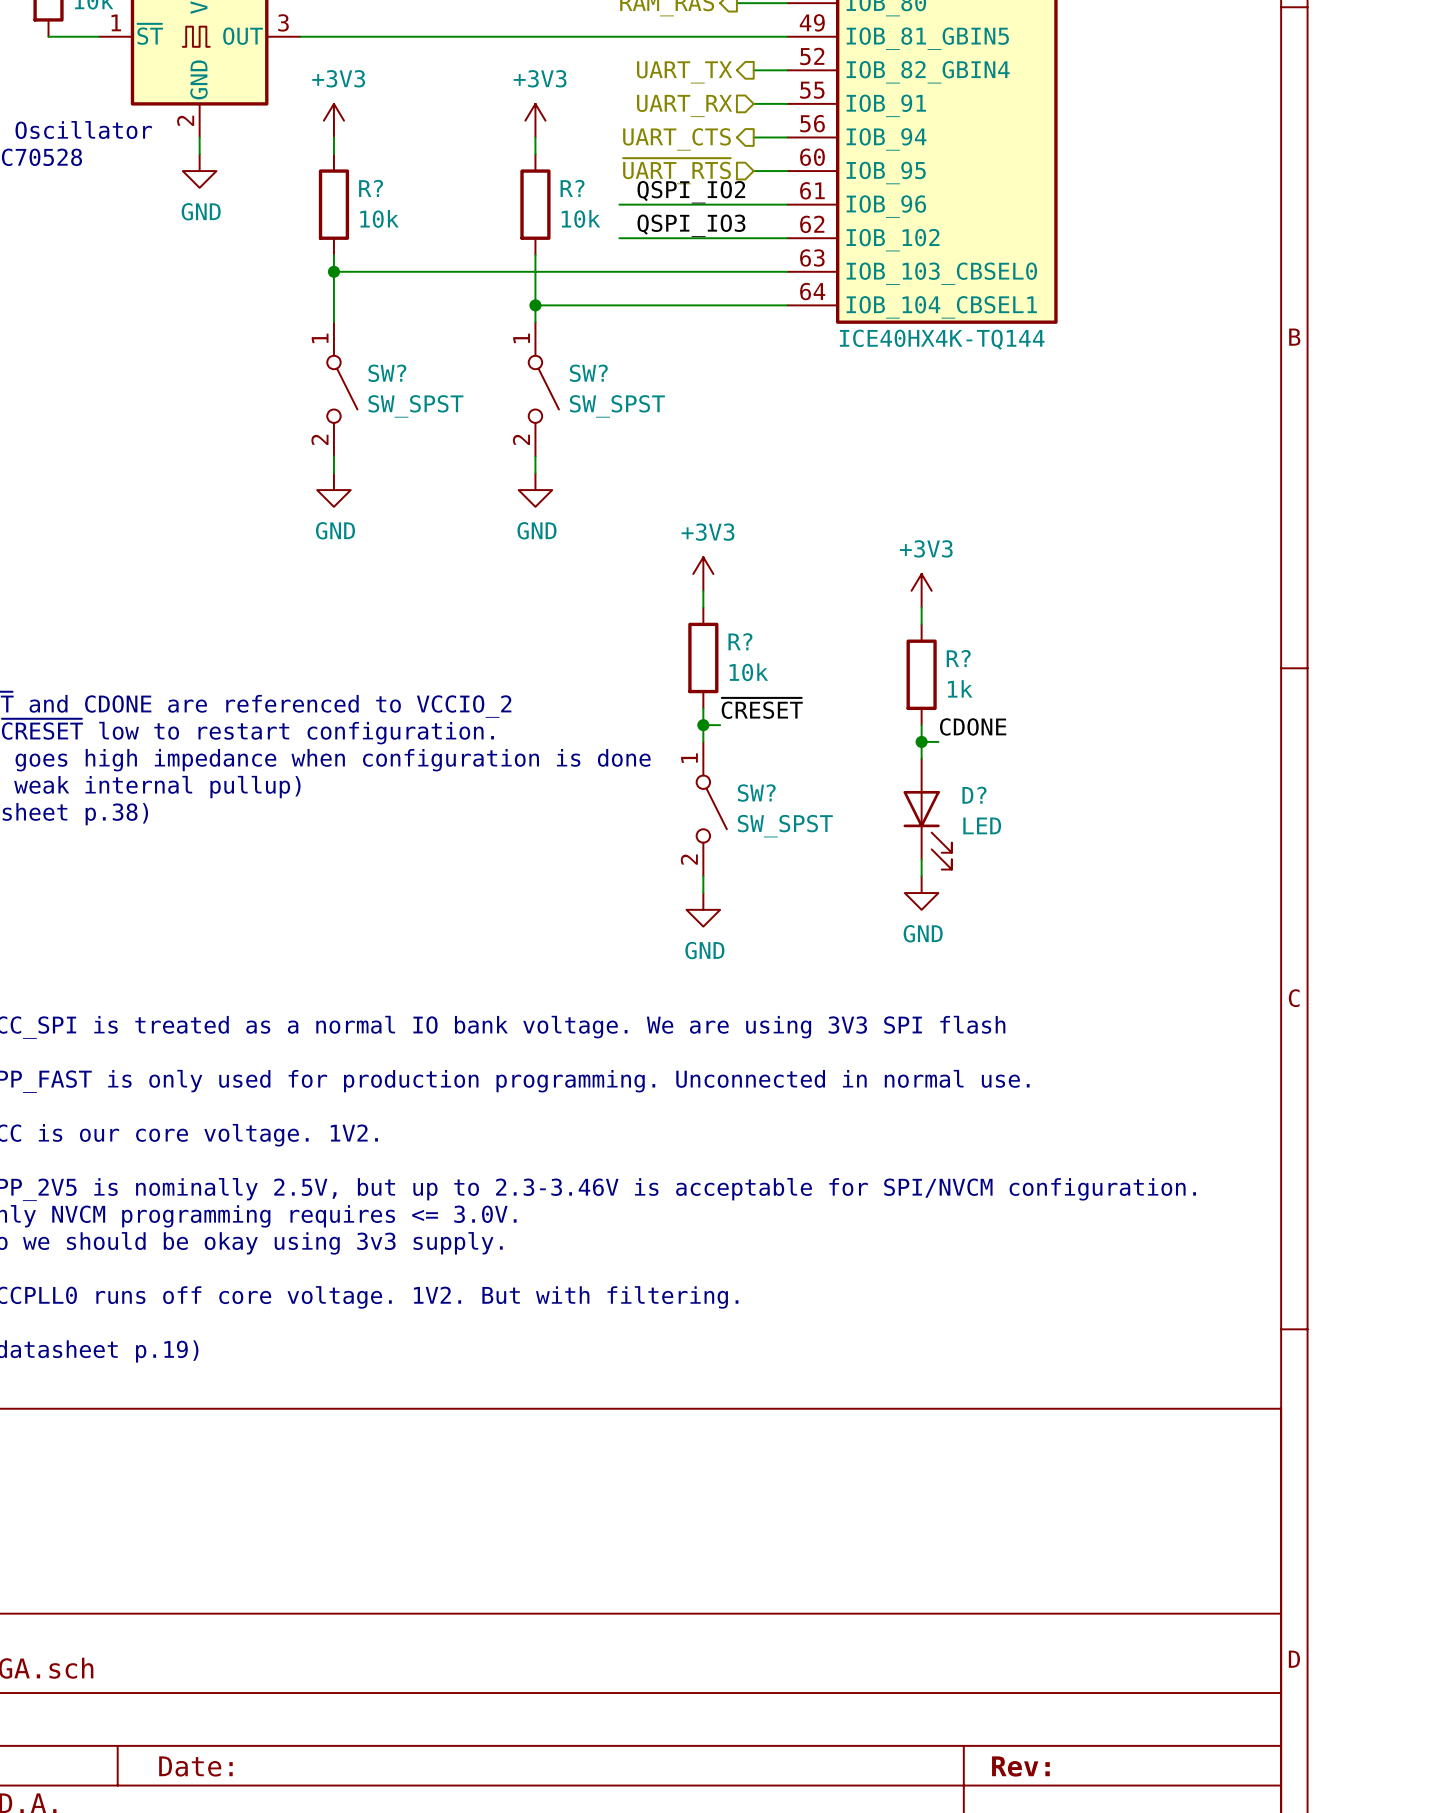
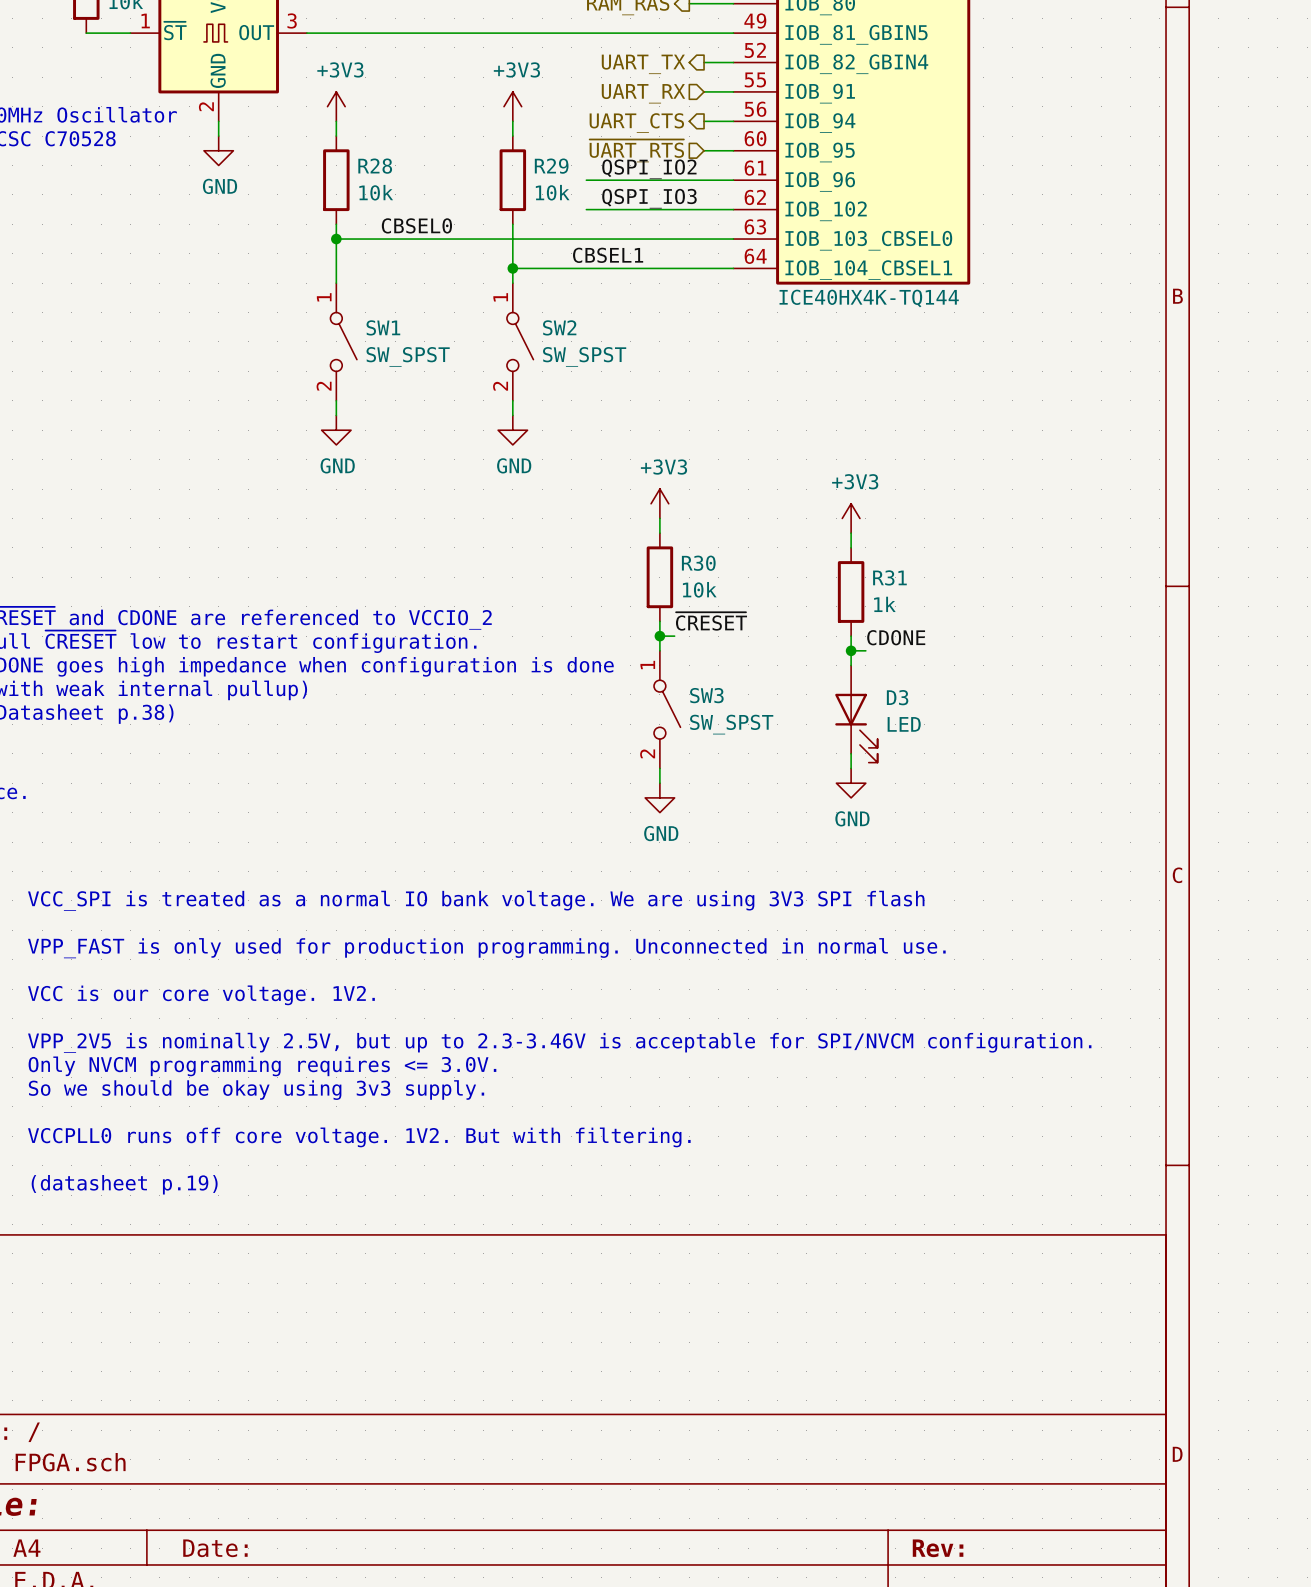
R? name: R? (371, 188) -> R28 (375, 166)
R? name: R? (572, 188) -> R29 (551, 166)
label: none -> CBSEL0 (416, 225)
label: none -> CBSEL1 (608, 255)
SW? name: SW? (387, 373) -> SW1 (383, 327)
SW? name: SW? (588, 373) -> SW2 (559, 327)
R? name: R? (740, 641) -> R30 (698, 563)
R? name: R? (958, 658) -> R31 (889, 577)
SW? name: SW? (756, 793) -> SW3 (706, 695)
D? name: D? (974, 795) -> D3 (897, 697)

